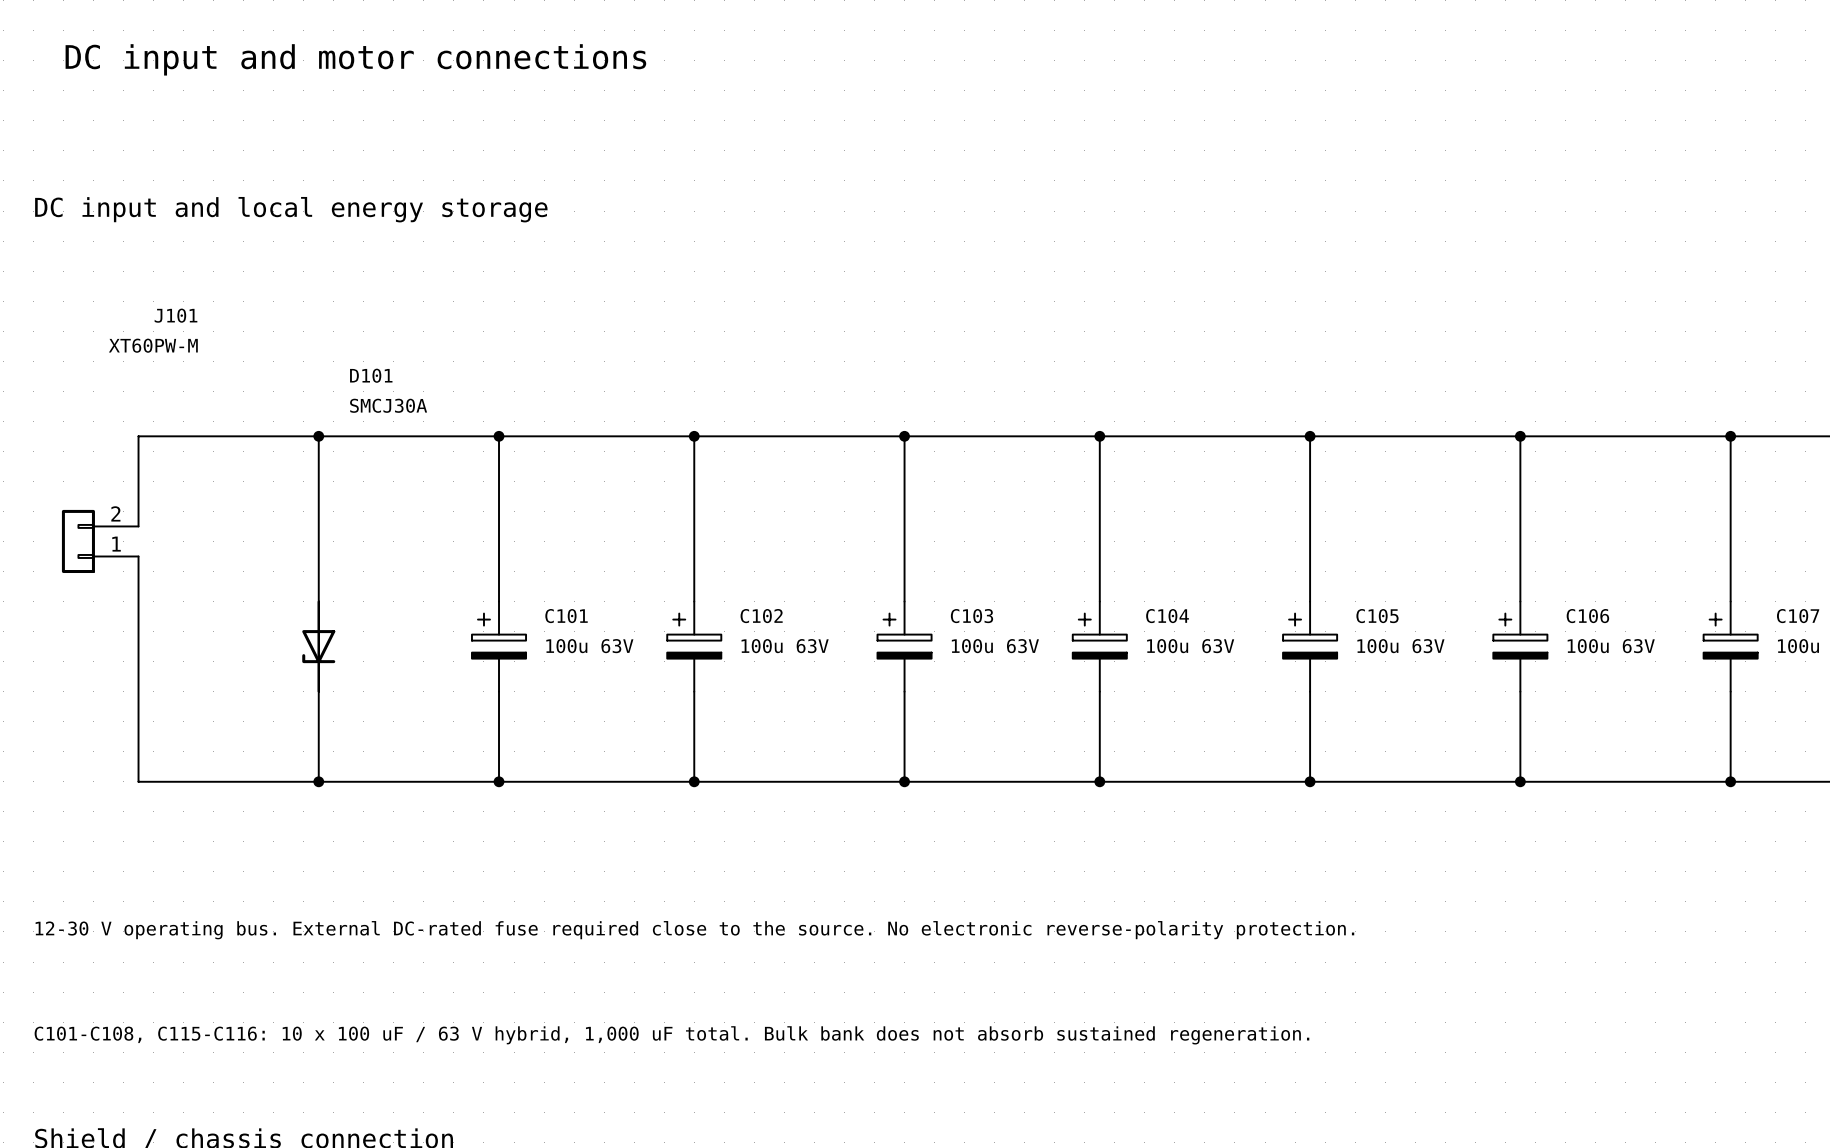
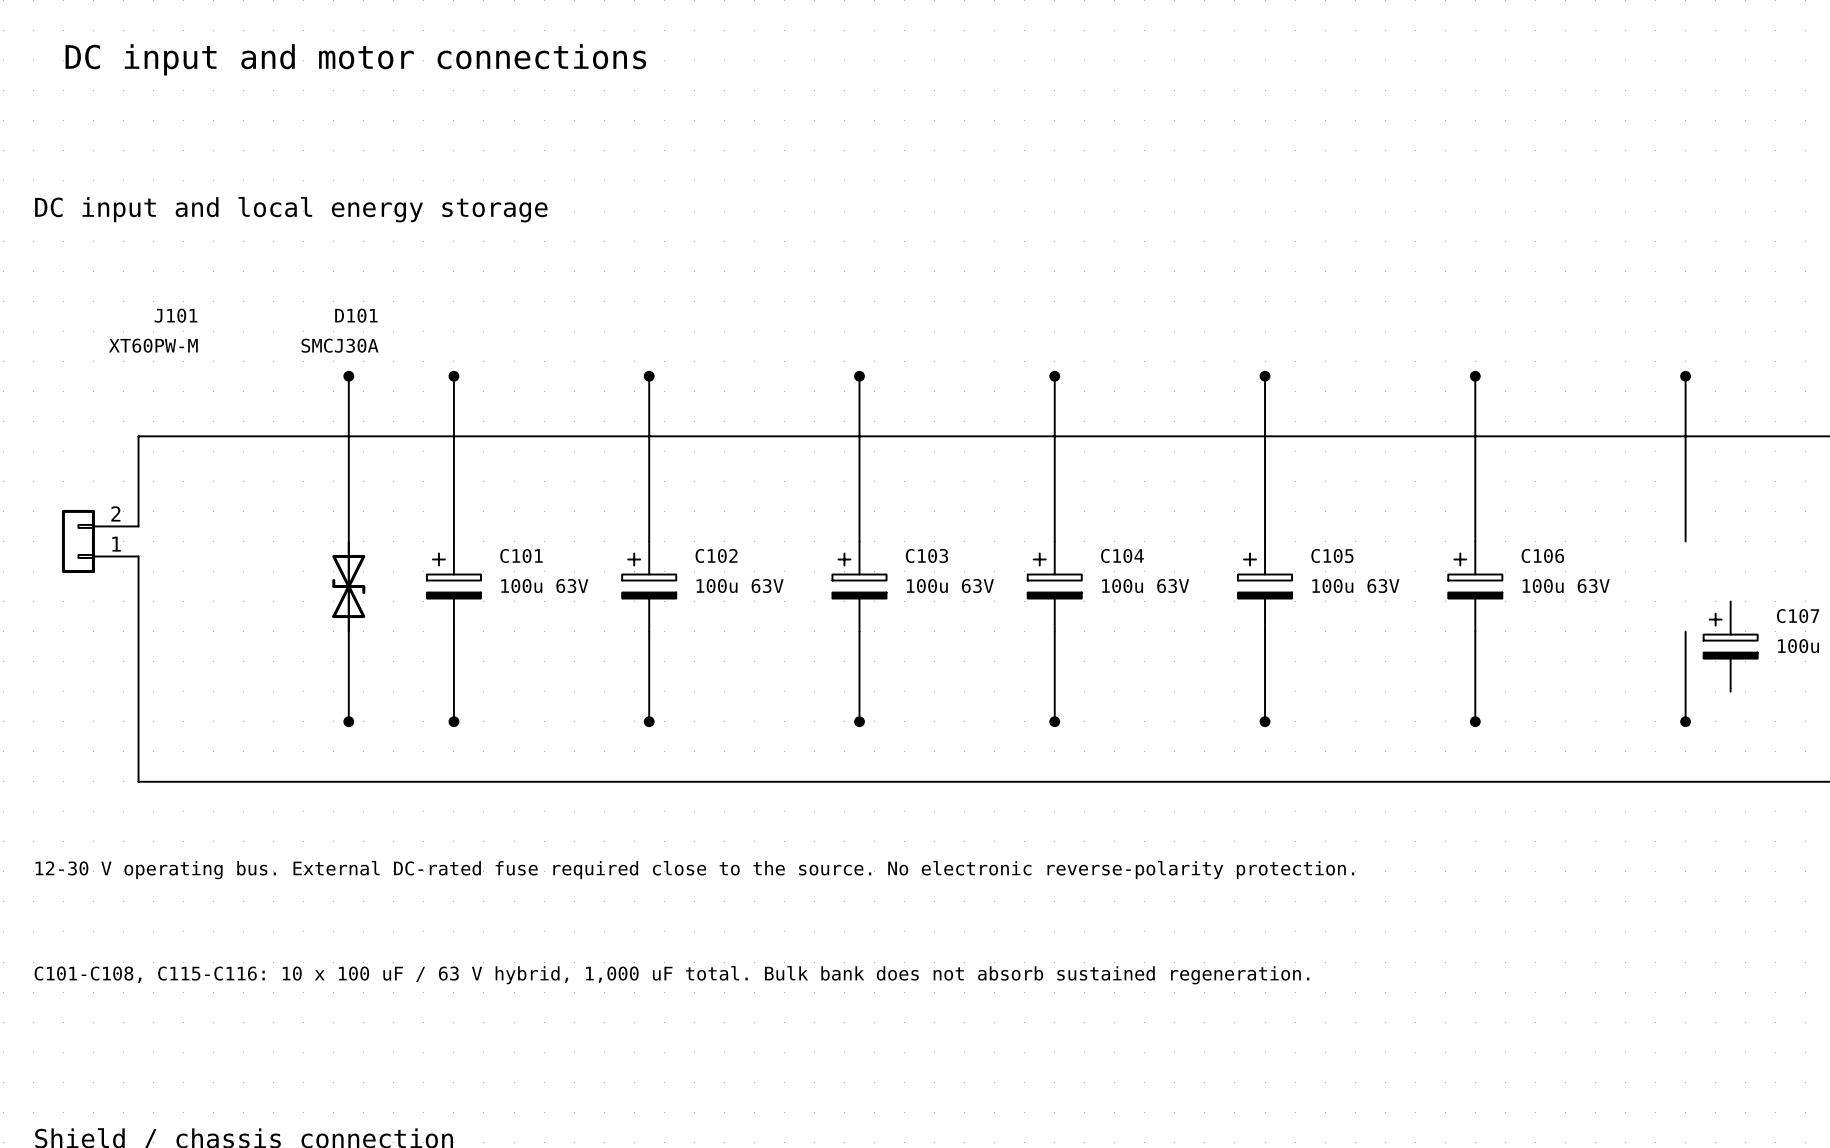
D101 name position: D101 (371, 375) -> D101 (356, 315)
junction: none -> (453, 376)
junction: none -> (649, 376)
junction: none -> (859, 376)
junction: none -> (1054, 376)
junction: none -> (1265, 376)
junction: none -> (1475, 376)
junction: none -> (1685, 376)
D101 value position: SMCJ30A (388, 405) -> SMCJ30A (340, 345)
wire: (318, 436) (318, 781) -> (348, 376) (348, 721)
junction position: (318, 436) -> (348, 376)
wire: (499, 436) (499, 601) -> (453, 376) (453, 541)
junction: (499, 436) -> none
wire: (694, 436) (694, 601) -> (649, 376) (649, 541)
junction: (694, 436) -> none
wire: (904, 436) (904, 601) -> (859, 376) (859, 541)
junction: (904, 436) -> none
wire: (1099, 436) (1099, 601) -> (1054, 376) (1054, 541)
junction: (1099, 436) -> none
wire: (1310, 436) (1310, 601) -> (1265, 376) (1265, 541)
junction: (1310, 436) -> none
wire: (1520, 436) (1520, 601) -> (1475, 376) (1475, 541)
junction: (1520, 436) -> none
wire: (1730, 436) (1730, 601) -> (1685, 376) (1685, 541)
junction: (1730, 436) -> none
D101 symbol: [302, 601, 336, 692] -> [332, 541, 366, 632]
C101 position: (499, 646) -> (453, 586)
C102 position: (694, 646) -> (649, 586)
C103 position: (904, 646) -> (859, 586)
C104 position: (1099, 646) -> (1054, 586)
C105 position: (1310, 646) -> (1265, 586)
C106 position: (1520, 646) -> (1475, 586)
wire: (499, 691) (499, 781) -> (453, 631) (453, 721)
wire: (694, 691) (694, 781) -> (649, 631) (649, 721)
wire: (904, 691) (904, 781) -> (859, 631) (859, 721)
wire: (1099, 691) (1099, 781) -> (1054, 631) (1054, 721)
wire: (1310, 691) (1310, 781) -> (1265, 631) (1265, 721)
wire: (1520, 691) (1520, 781) -> (1475, 631) (1475, 721)
wire: (1730, 691) (1730, 781) -> (1685, 631) (1685, 721)
junction: none -> (453, 721)
junction: none -> (649, 721)
junction: none -> (859, 721)
junction: none -> (1054, 721)
junction: none -> (1265, 721)
junction: none -> (1475, 721)
junction: none -> (1685, 721)
junction position: (318, 781) -> (348, 721)
junction: (499, 781) -> none
junction: (694, 781) -> none
junction: (904, 781) -> none
junction: (1099, 781) -> none
junction: (1310, 781) -> none
junction: (1520, 781) -> none
junction: (1730, 781) -> none
text position: 12-30 V operating bus. External DC-rated fuse required close to the source. No electronic reverse-polarity protection. (694, 930) -> 12-30 V operating bus. External DC-rated fuse required close to the source. No electronic reverse-polarity protection. (694, 870)
text position: C101-C108, C115-C116: 10 x 100 uF / 63 V hybrid, 1,000 uF total. Bulk bank does not absorb sustained regeneration. (671, 1035) -> C101-C108, C115-C116: 10 x 100 uF / 63 V hybrid, 1,000 uF total. Bulk bank does not absorb sustained regeneration. (671, 975)

